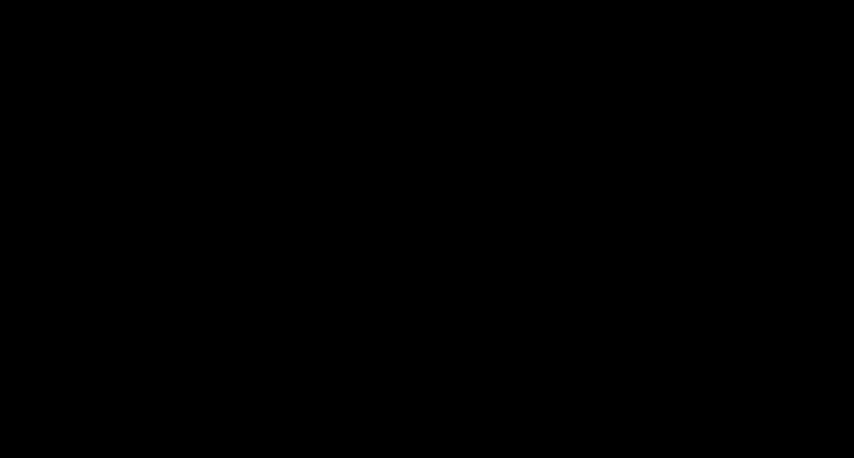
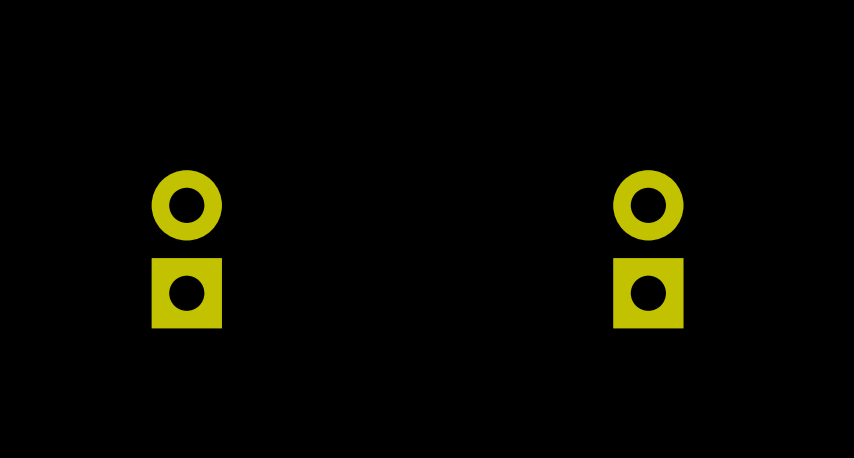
part: none -> (186, 249)
part: none -> (648, 249)

